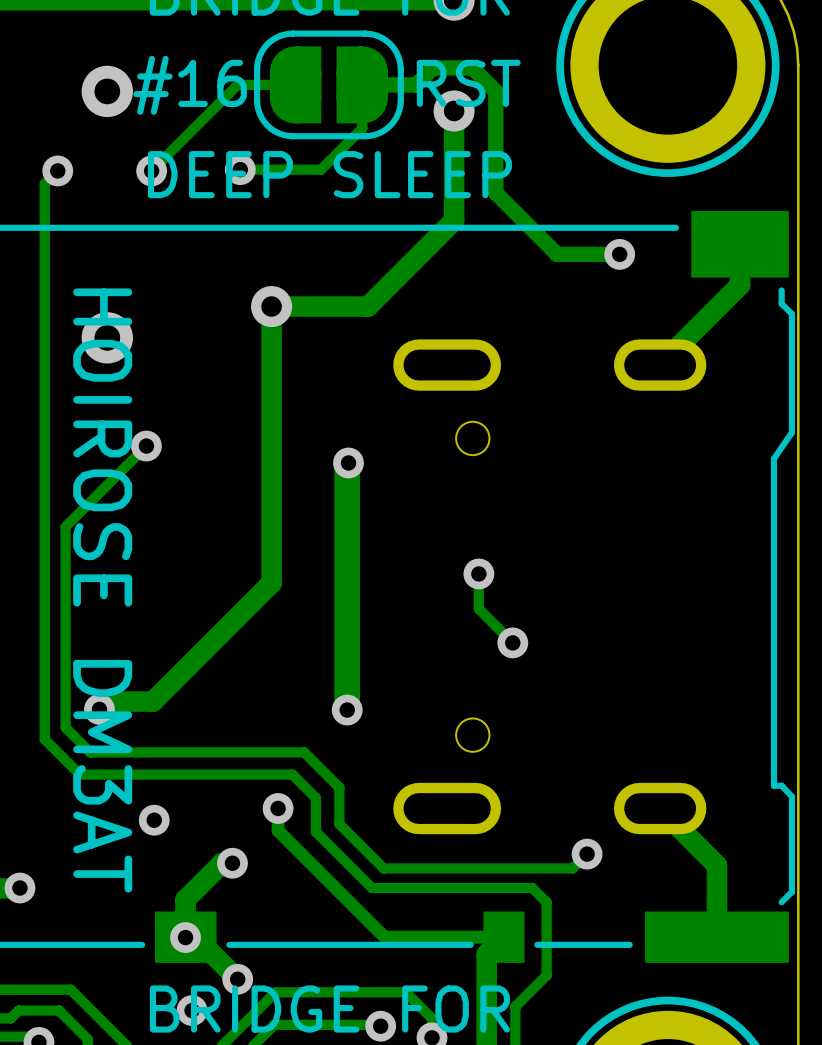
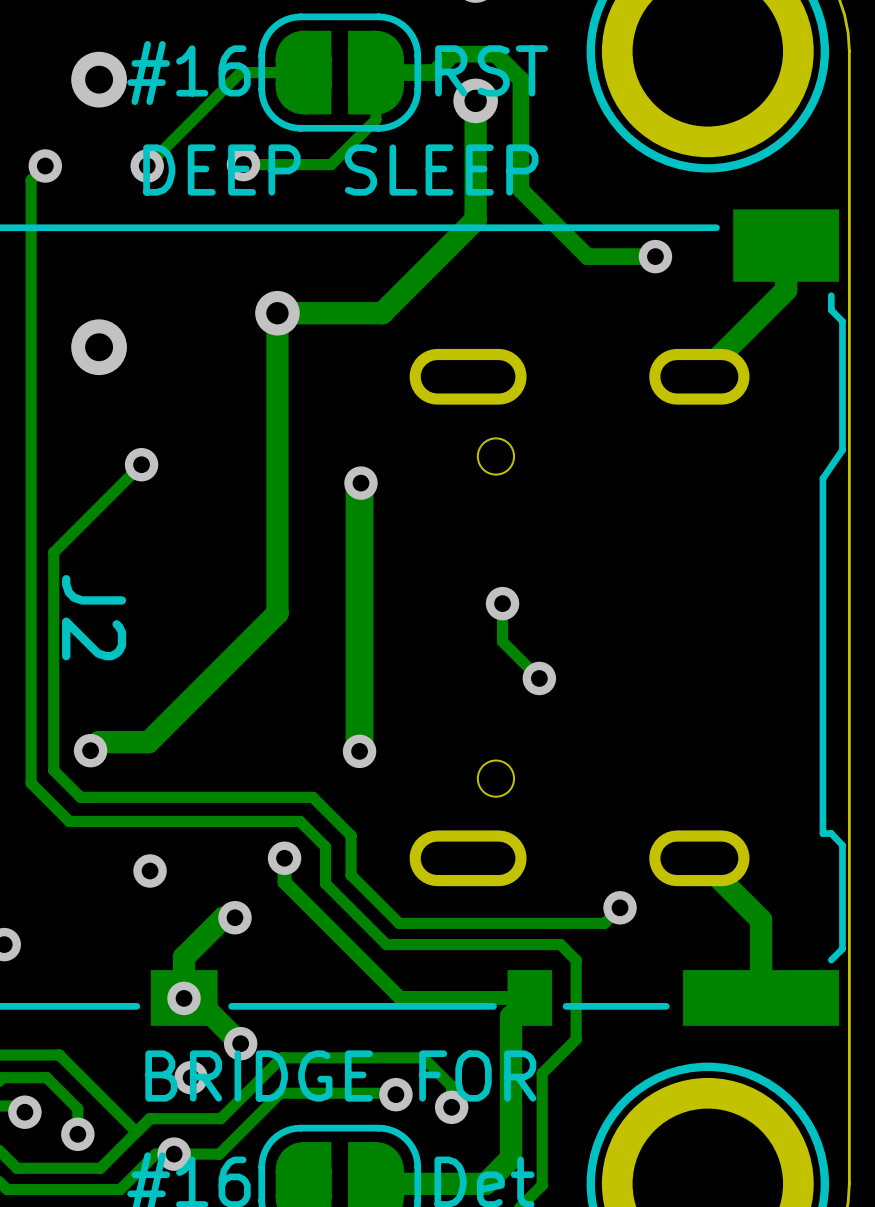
HOIROSE DM3AT name: HOIROSE DM3AT (102, 590) -> J2 (94, 617)

